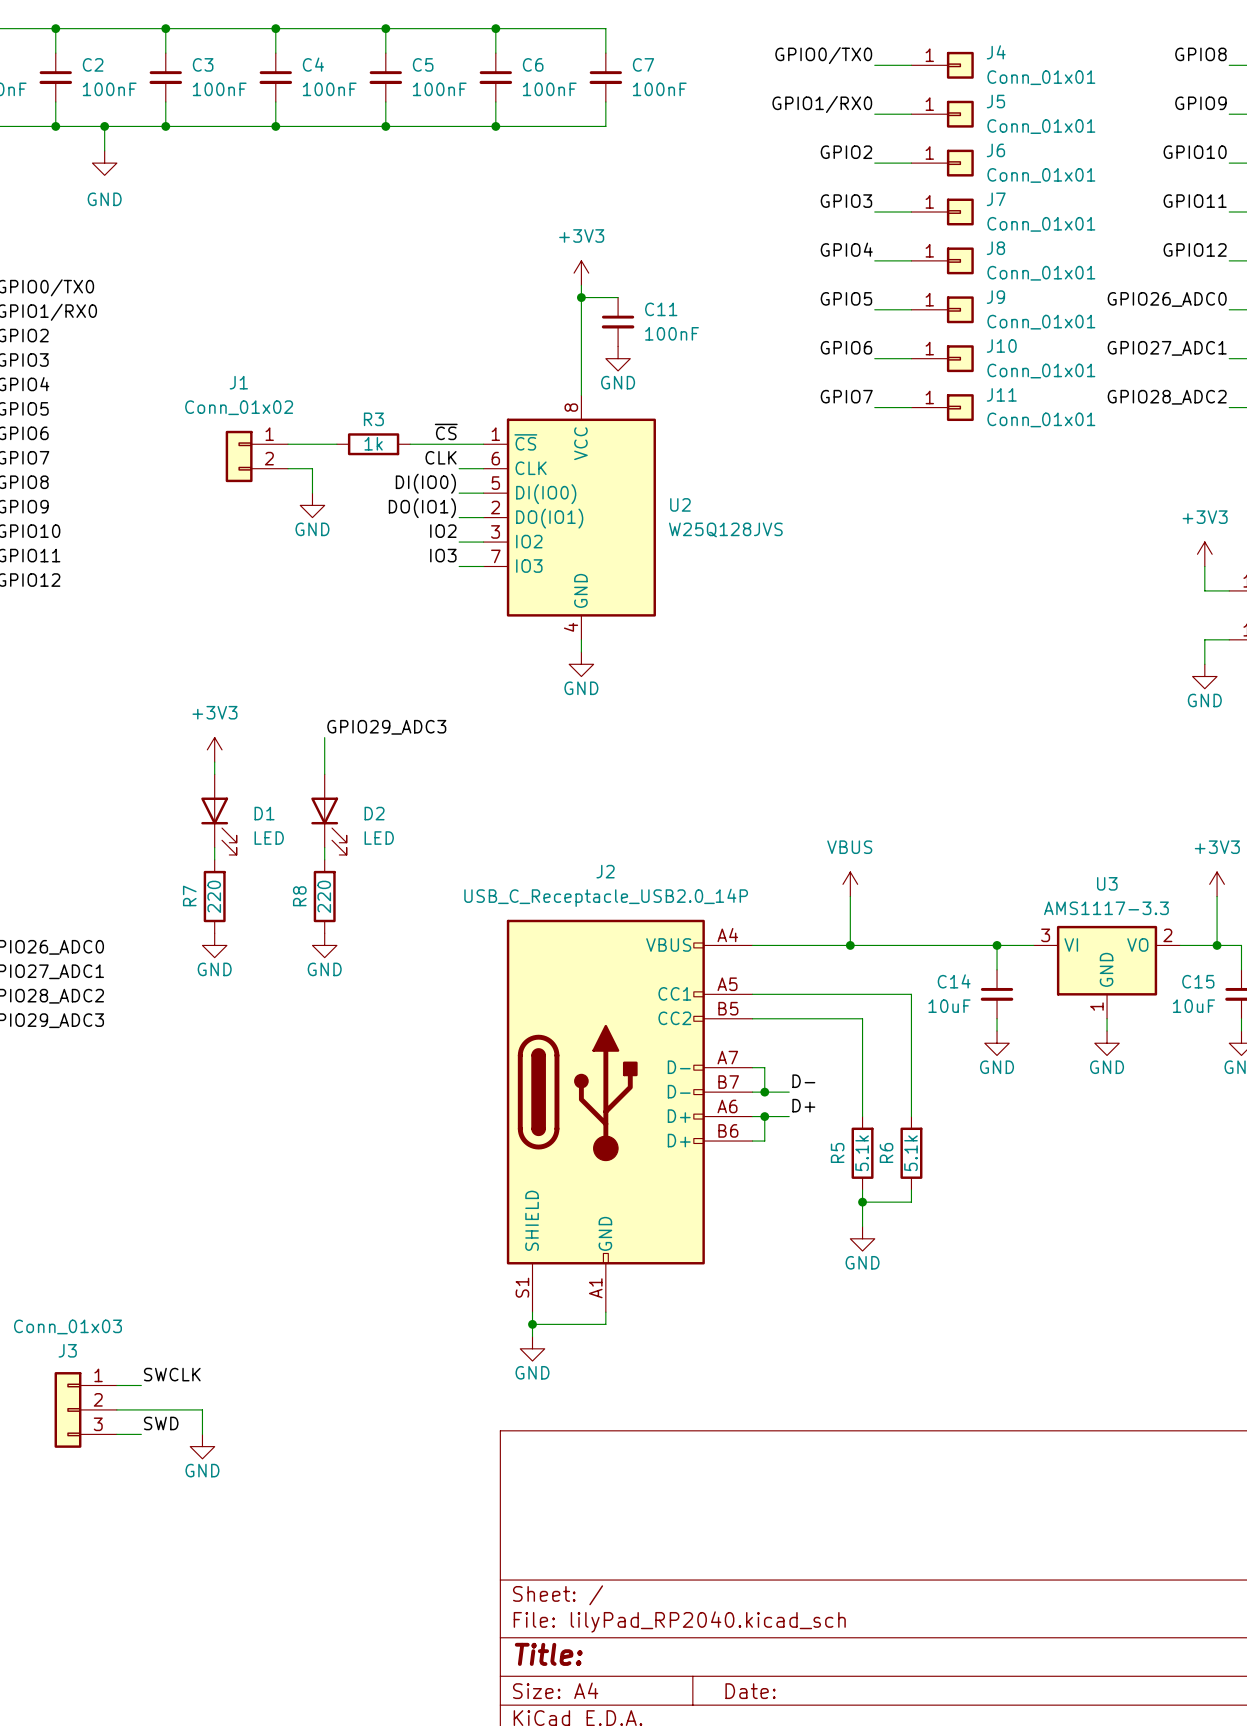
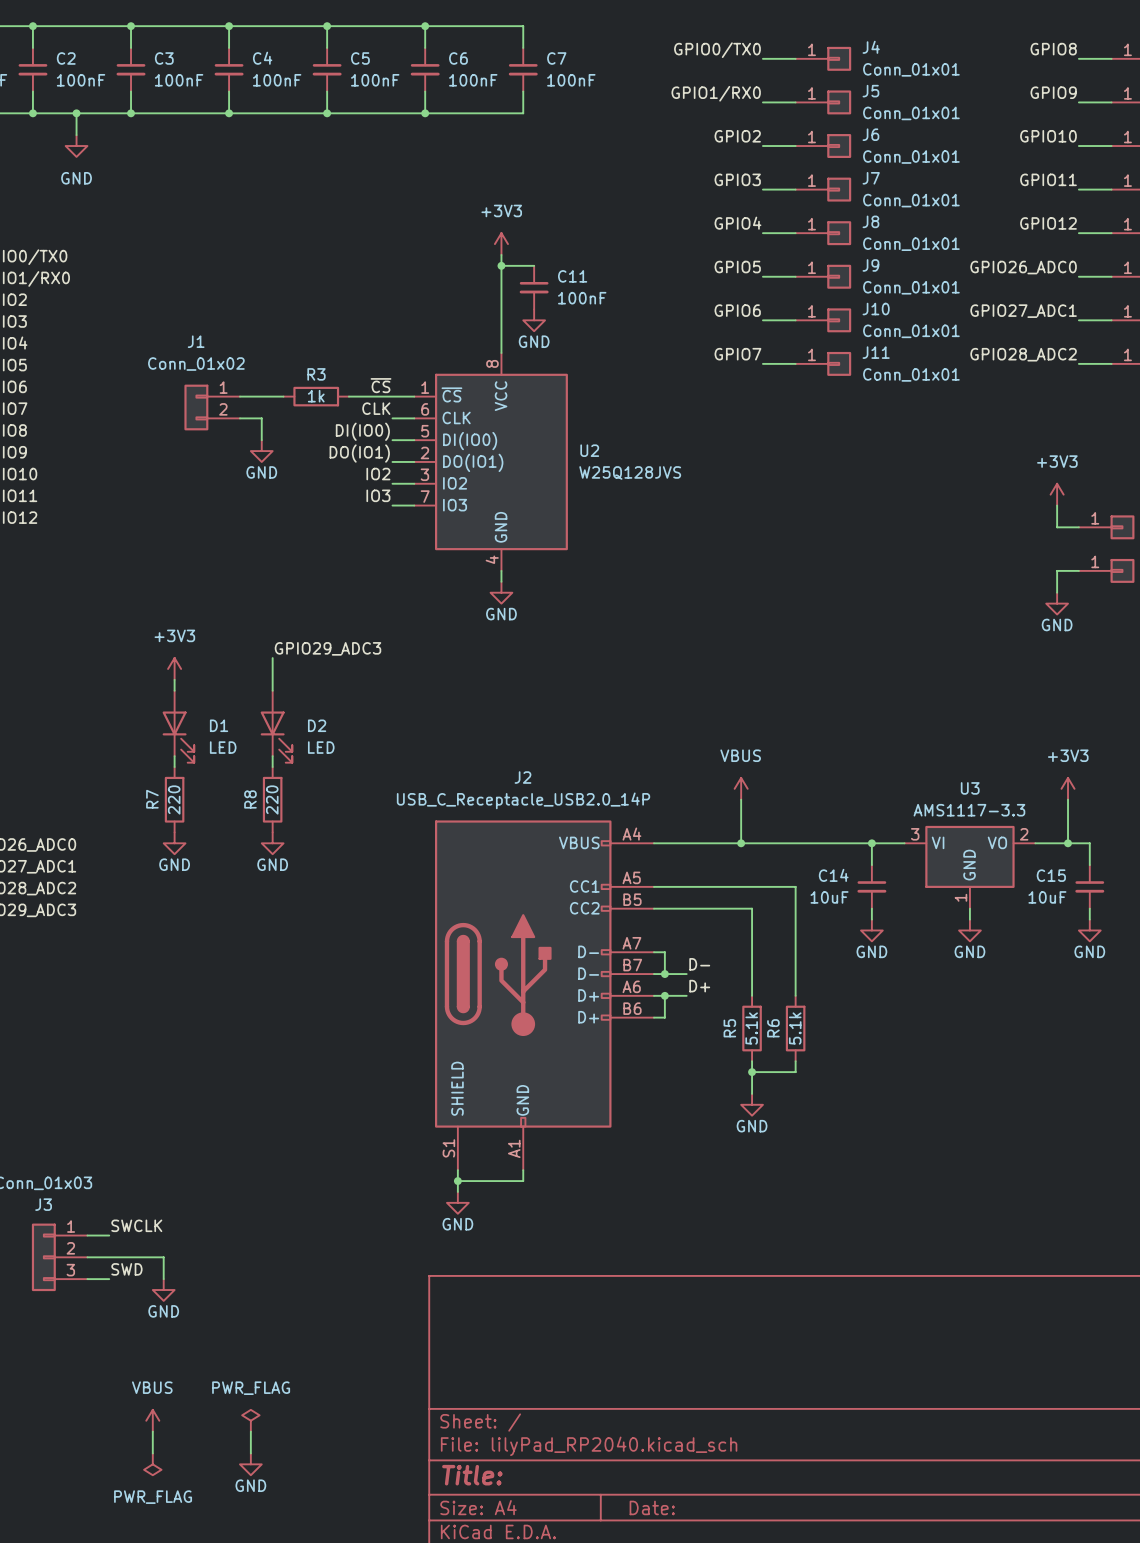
power symbol: none -> VBUS (152, 1420)
power symbol: none -> PWR_FLAG (250, 1420)
wire: none -> (152, 1431) (152, 1453)
wire: none -> (250, 1431) (250, 1453)
power symbol: none -> PWR_FLAG (152, 1464)
power symbol: none -> GND (250, 1464)

